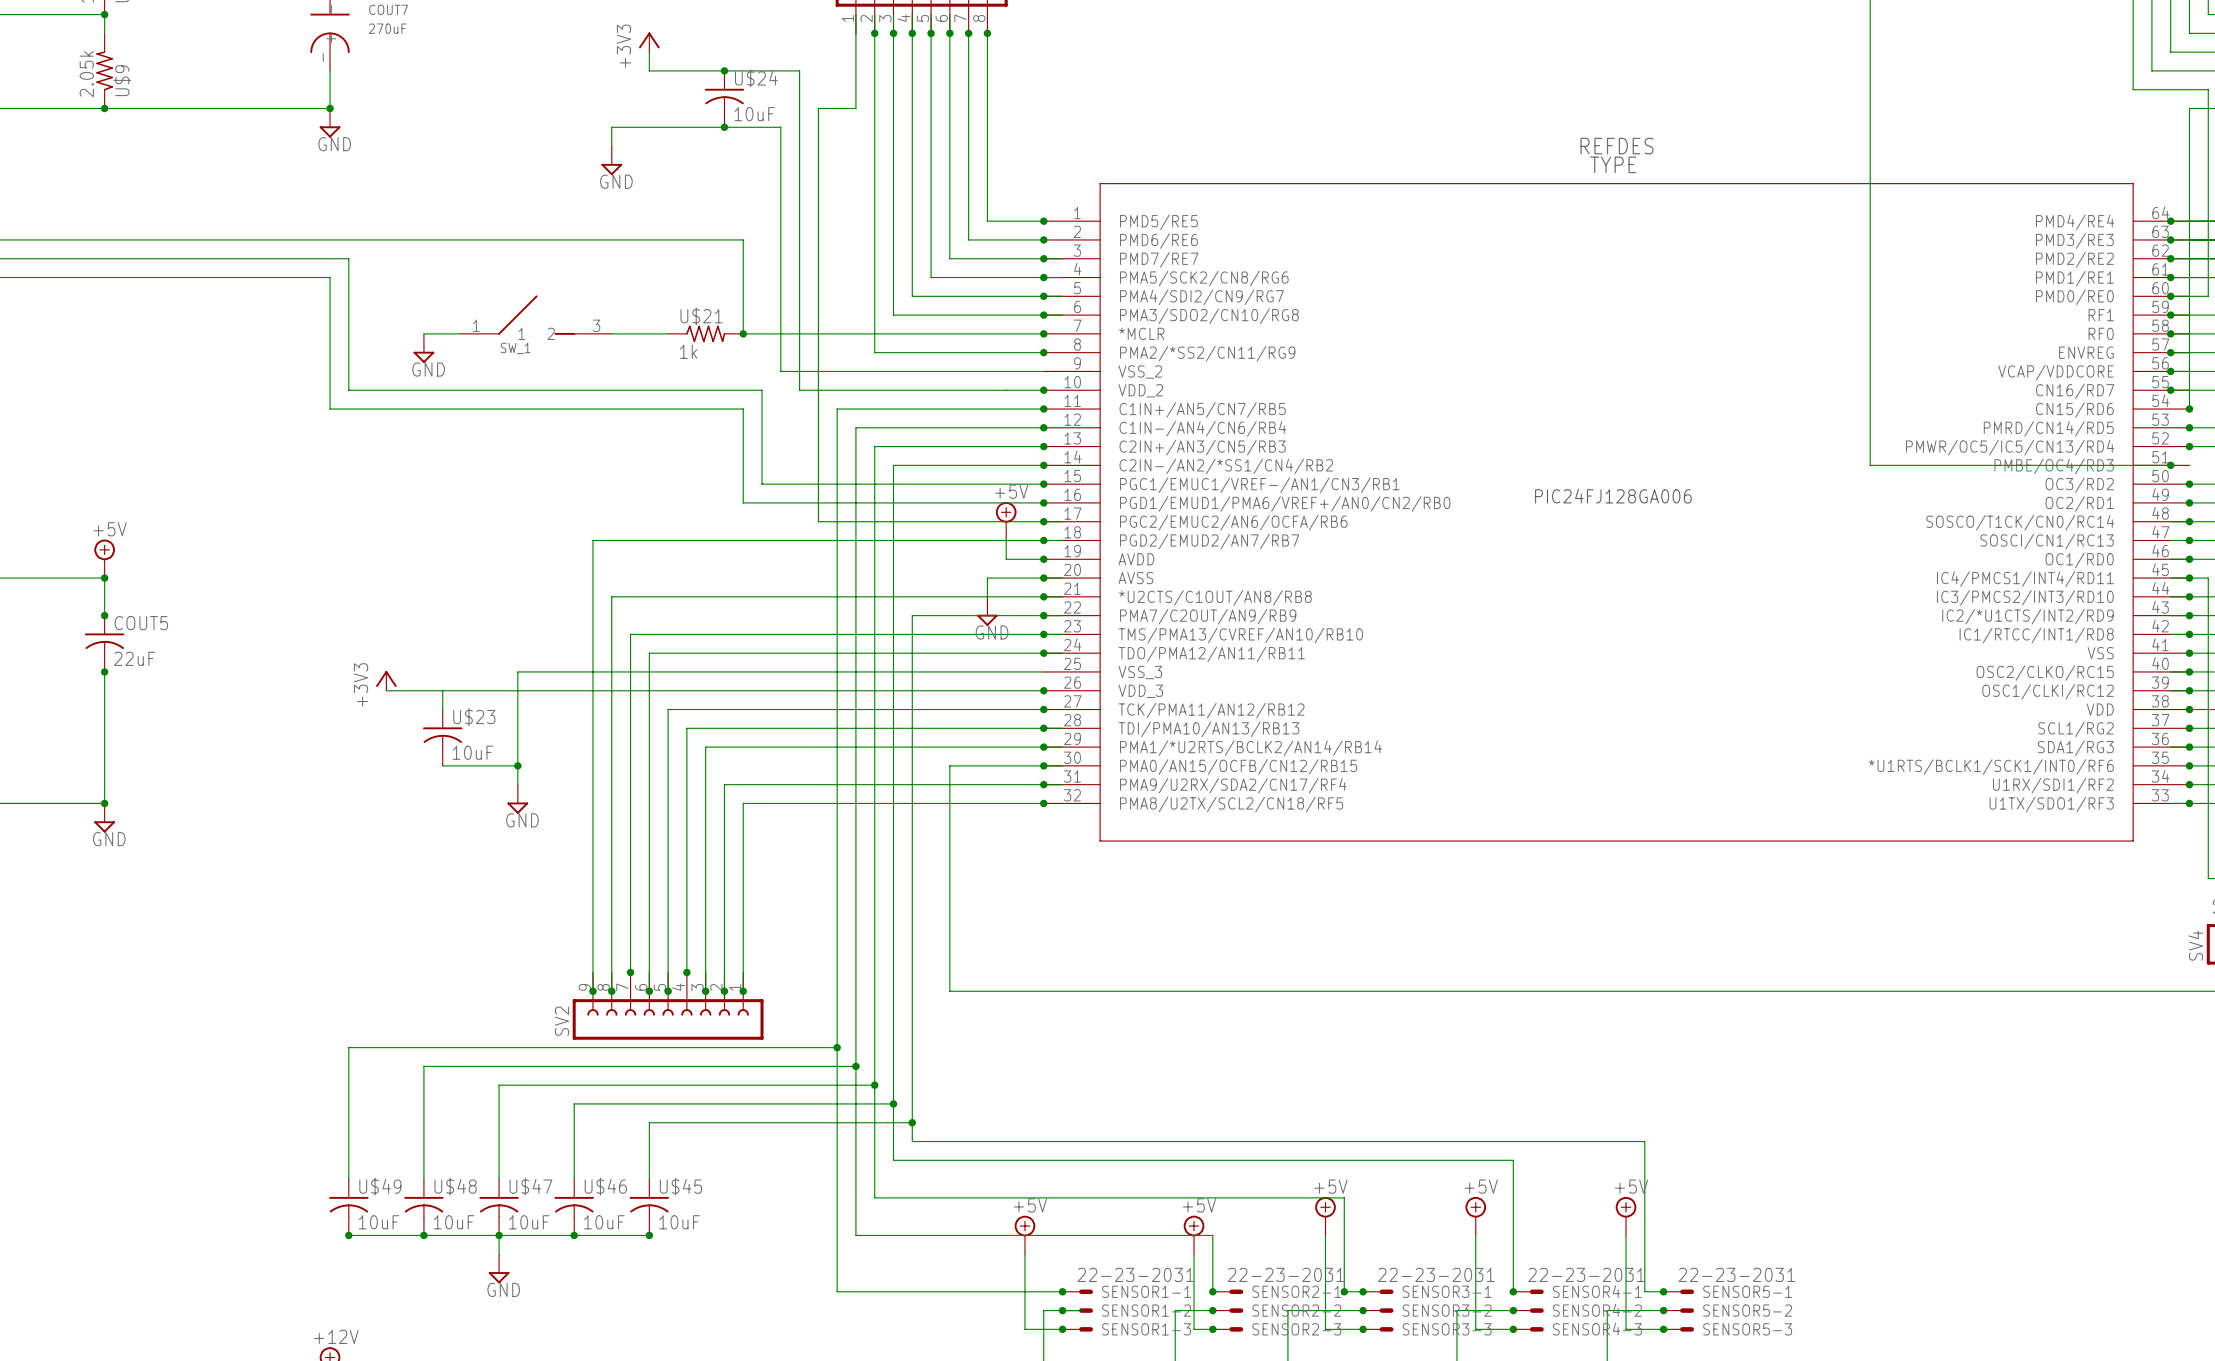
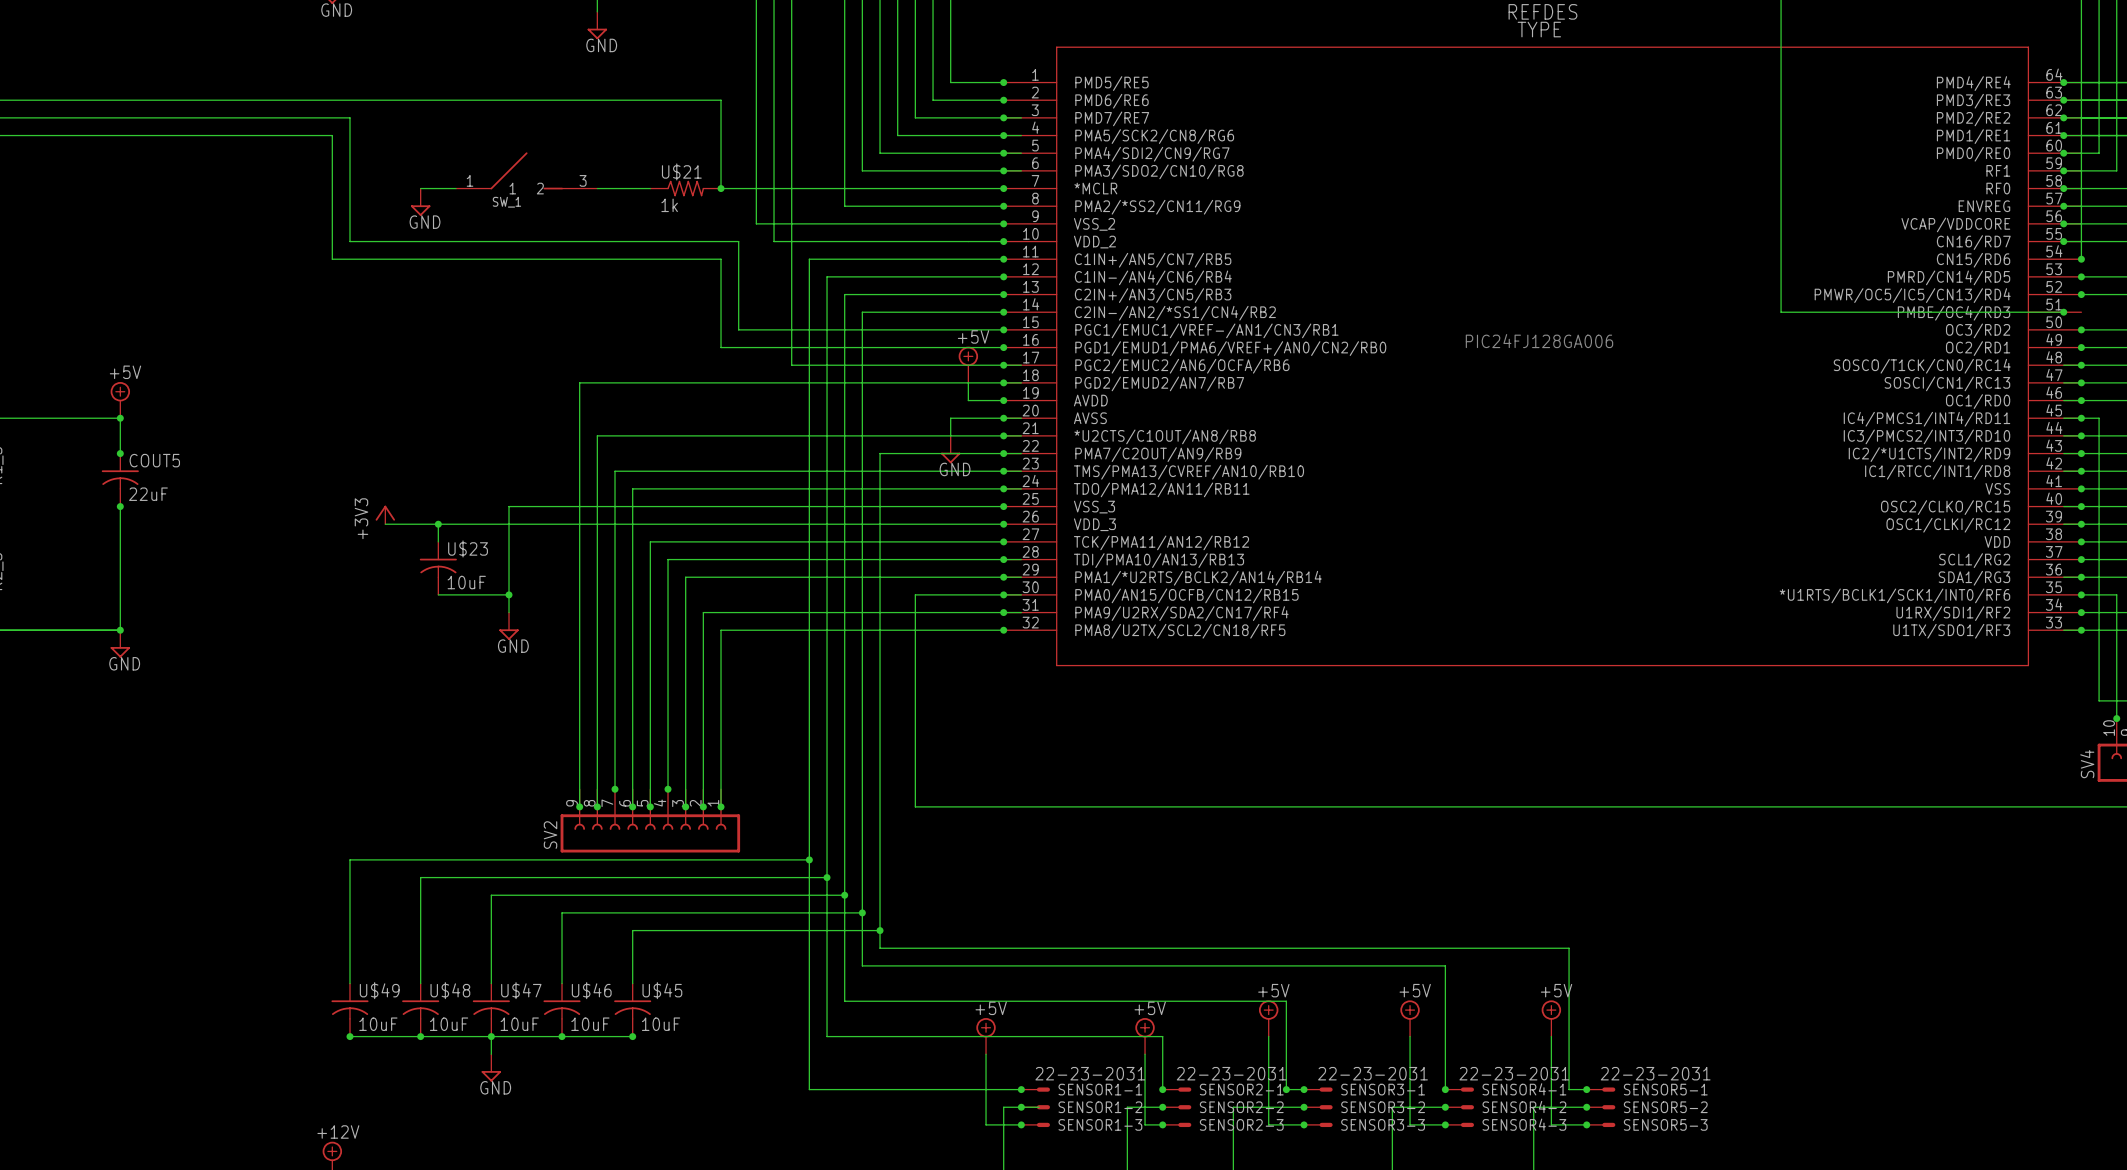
junction: none -> (1003, 223)
junction: none -> (1003, 506)
junction: none -> (438, 524)

